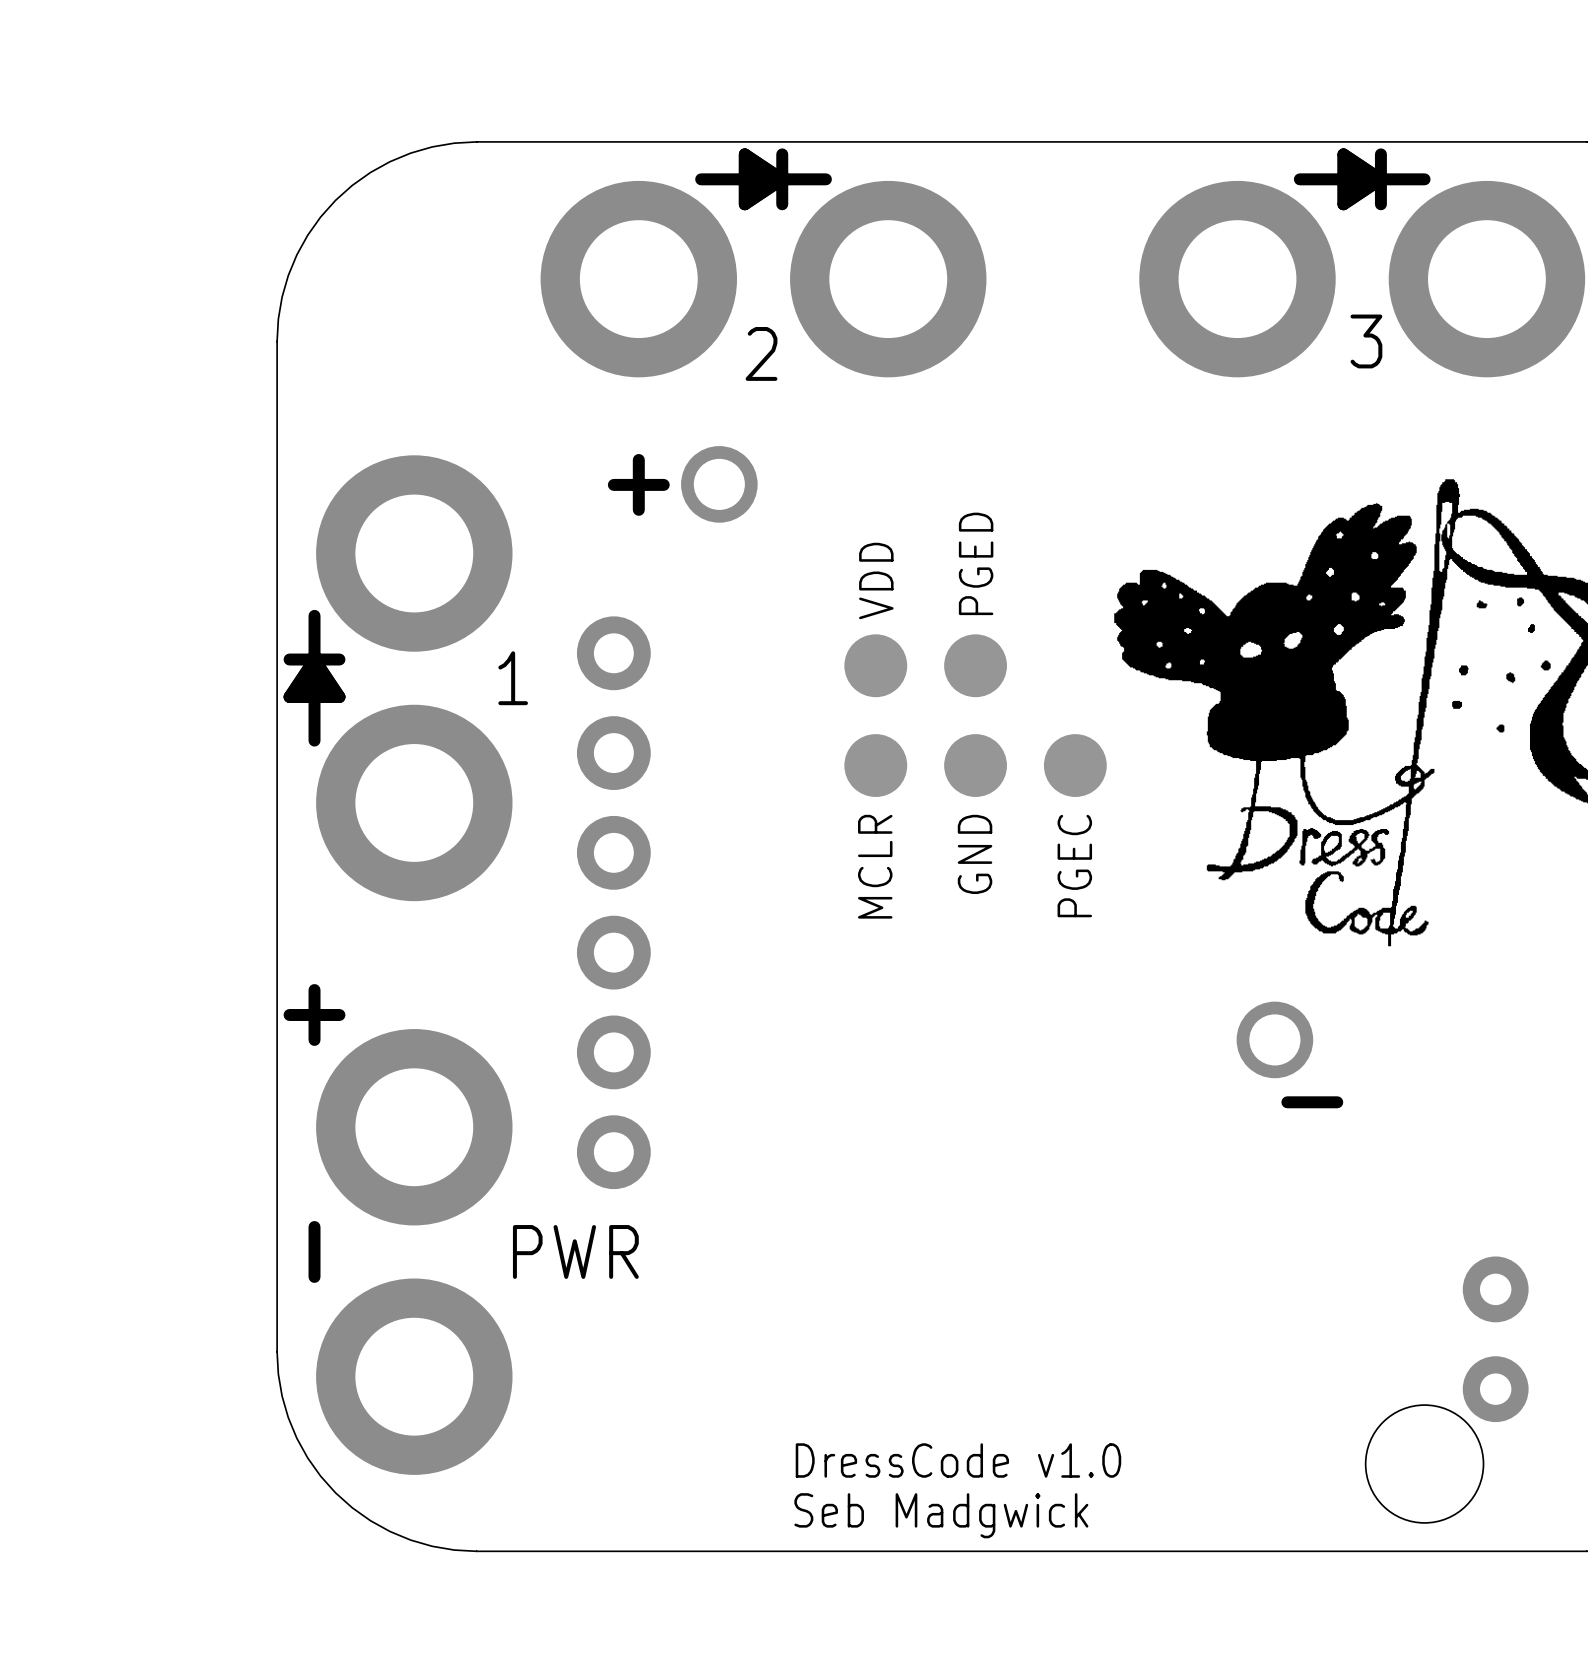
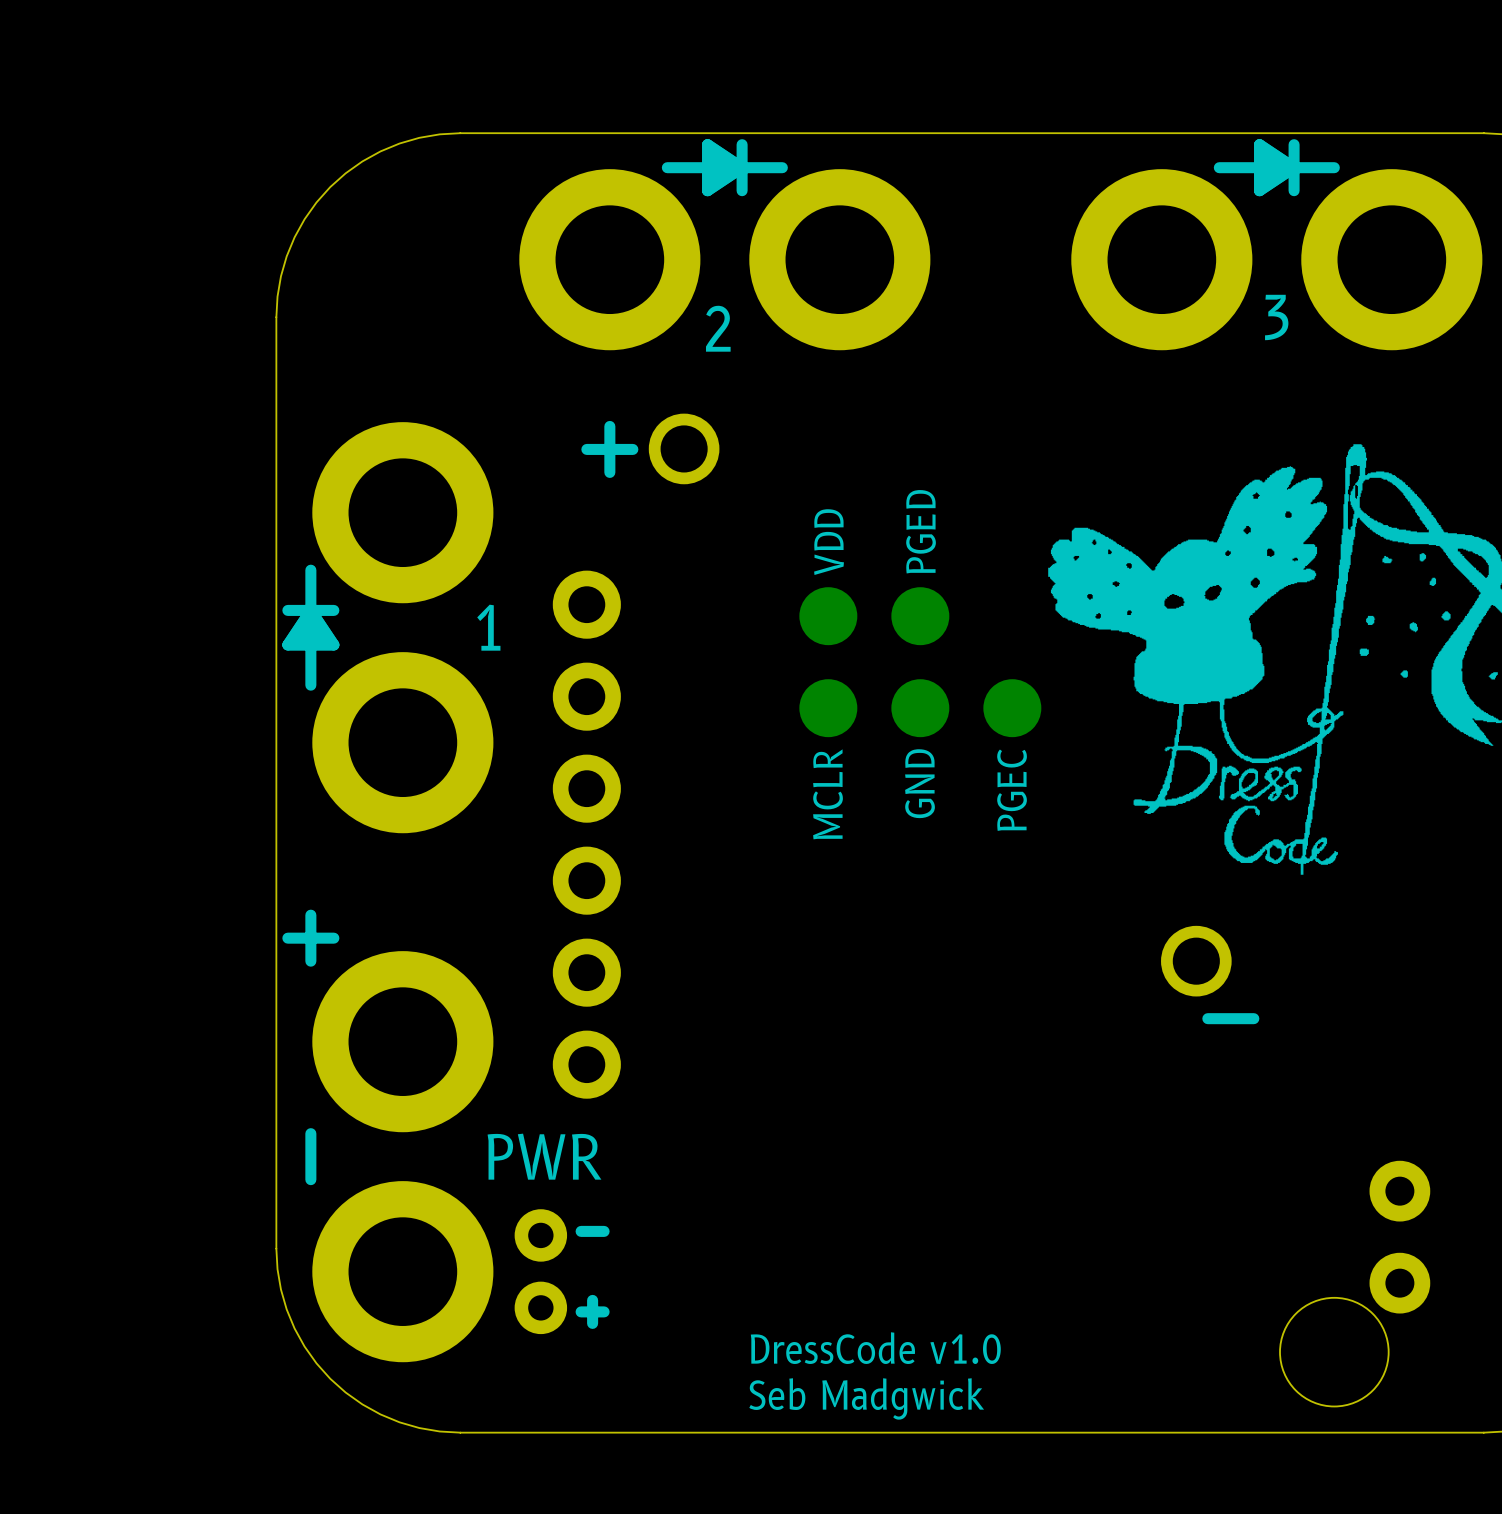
line: none -> (604, 1231) (581, 1231)
part: none -> (540, 1271)
line: none -> (592, 1300) (592, 1323)
line: none -> (604, 1311) (581, 1311)

